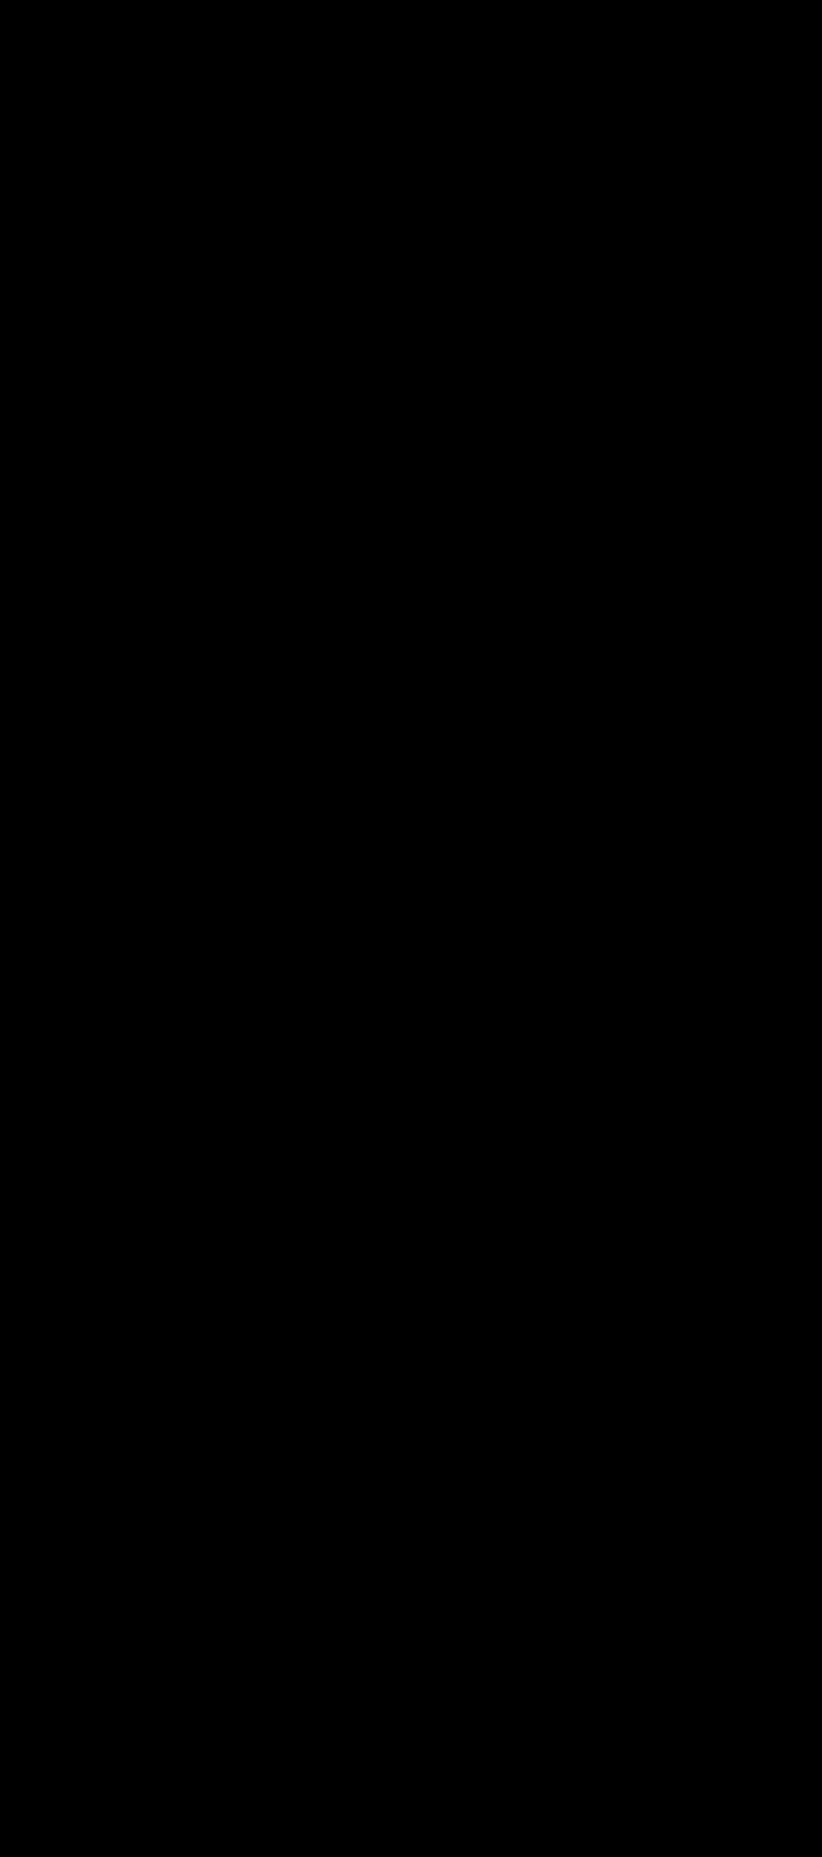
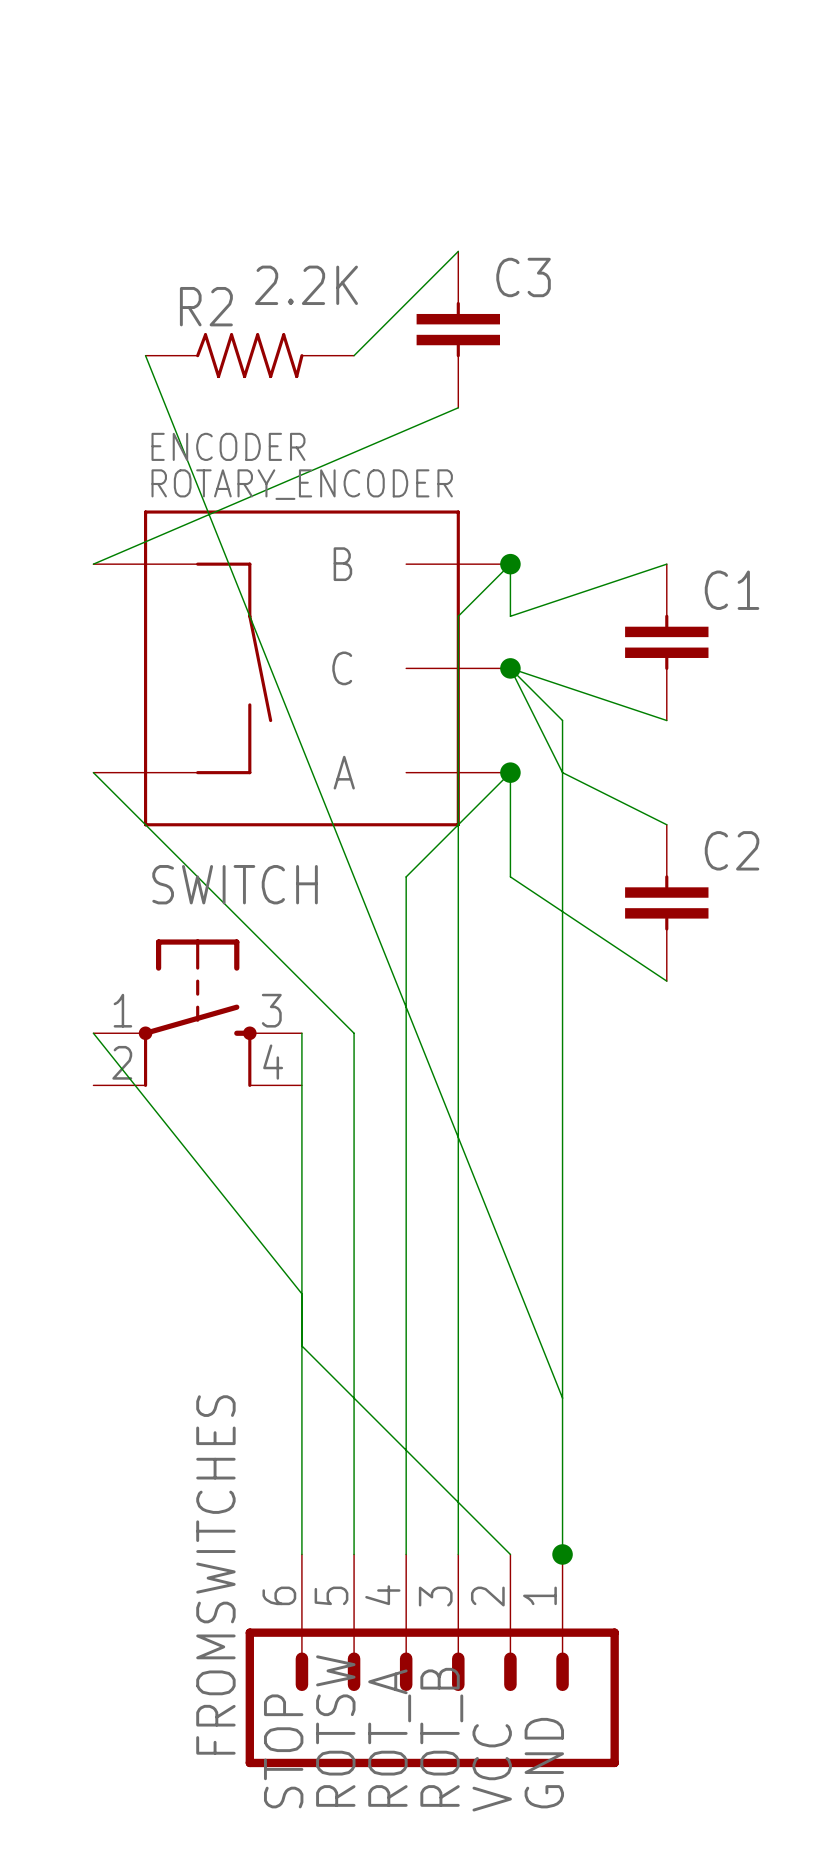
wire: none -> (458, 251) (354, 355)
C3: none -> (458, 329)
wire: none -> (145, 355) (562, 1398)
R2: none -> (249, 355)
wire: none -> (458, 407) (93, 564)
junction: none -> (510, 564)
wire: none -> (666, 564) (510, 616) (510, 564) (458, 616) (458, 1554)
C1: none -> (666, 642)
ENCODER: none -> ROTARY_ENCODER (301, 668)
wire: none -> (510, 668) (666, 720)
wire: none -> (510, 668) (562, 772) (666, 824)
wire: none -> (510, 668) (562, 720) (562, 1554)
junction: none -> (510, 668)
wire: none -> (93, 772) (354, 1033) (354, 1554)
junction: none -> (510, 772)
C2: none -> (666, 902)
wire: none -> (666, 981) (510, 876) (510, 772) (406, 876) (406, 1554)
SWITCH: none -> (197, 1013)
wire: none -> (93, 1033) (301, 1293)
wire: none -> (301, 1033) (301, 1554)
wire: none -> (301, 1345) (510, 1554)
junction: none -> (562, 1554)
FROMSWITCHES: none -> (432, 1660)

